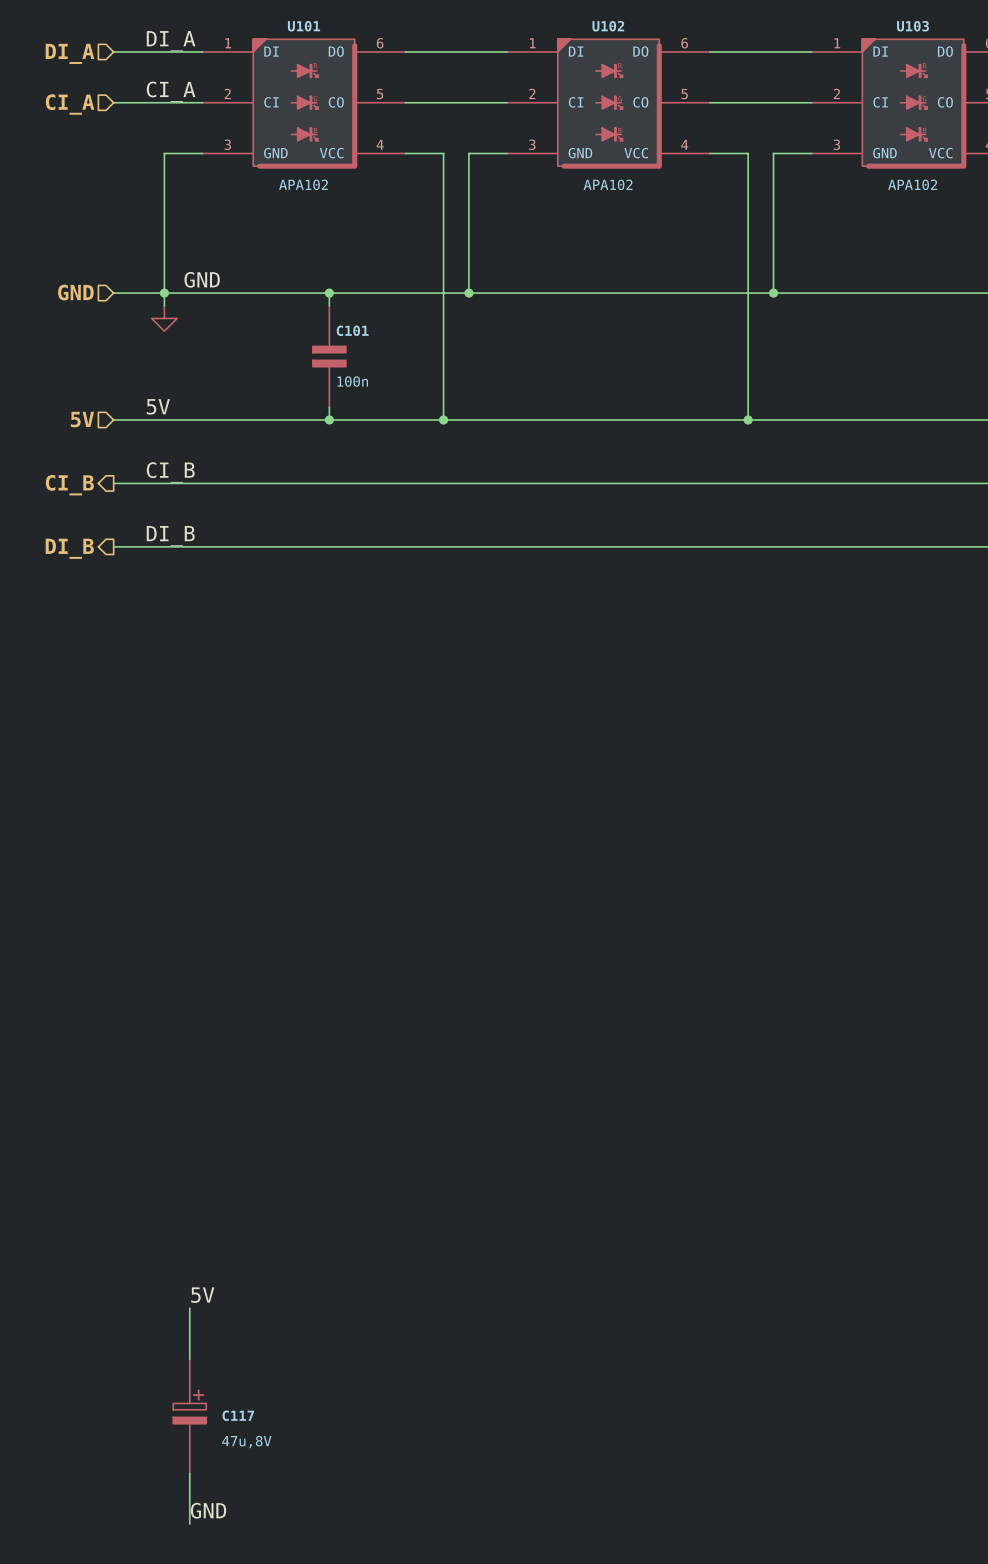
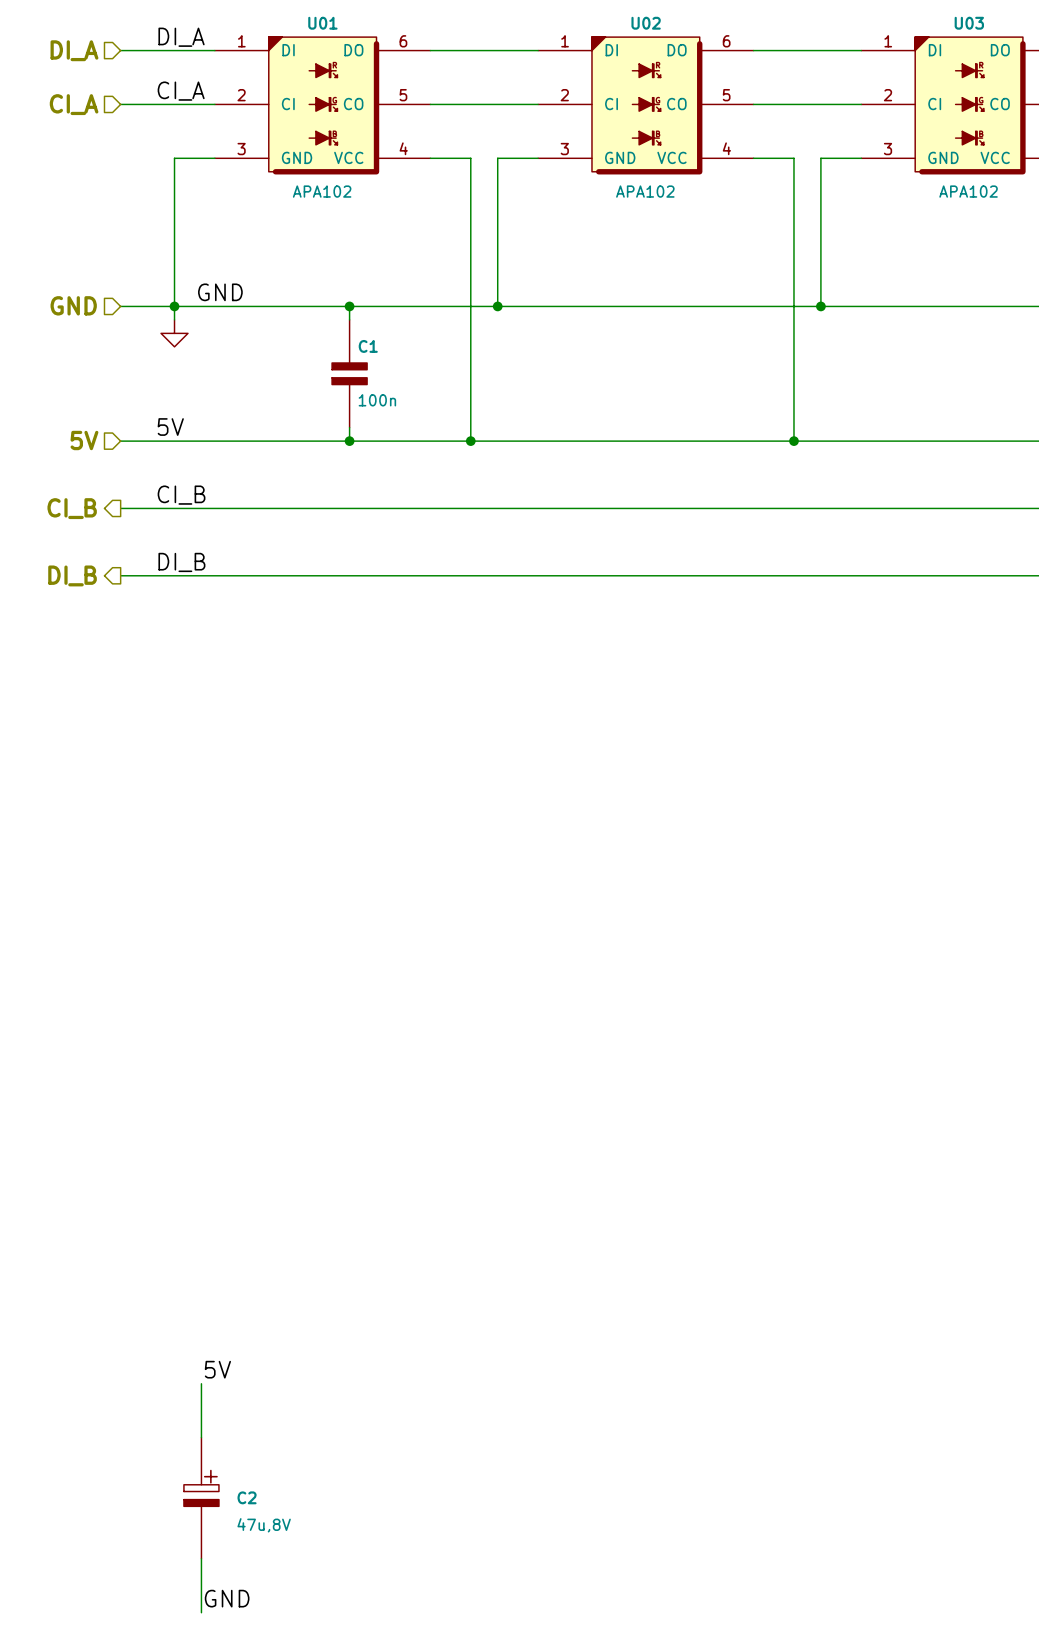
U101 name: U101 (304, 26) -> U01 (322, 23)
U102 name: U102 (608, 26) -> U02 (646, 23)
U103 name: U103 (913, 26) -> U03 (969, 23)
C101 name: C101 (352, 330) -> C1 (368, 346)
C117 name: C117 (238, 1415) -> C2 (247, 1497)

